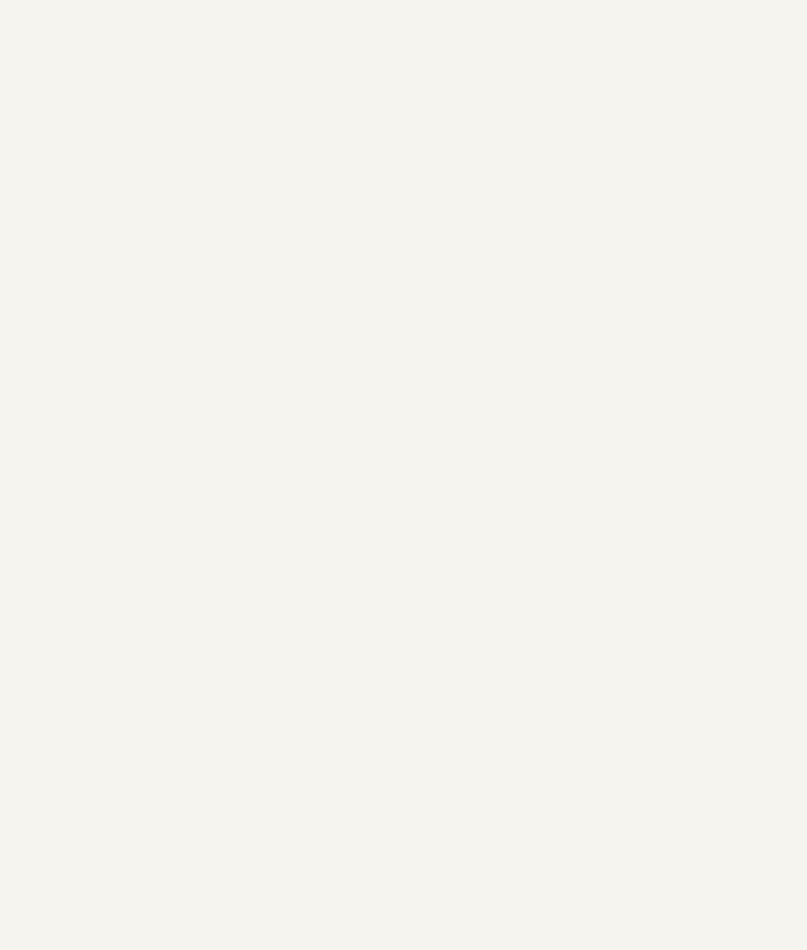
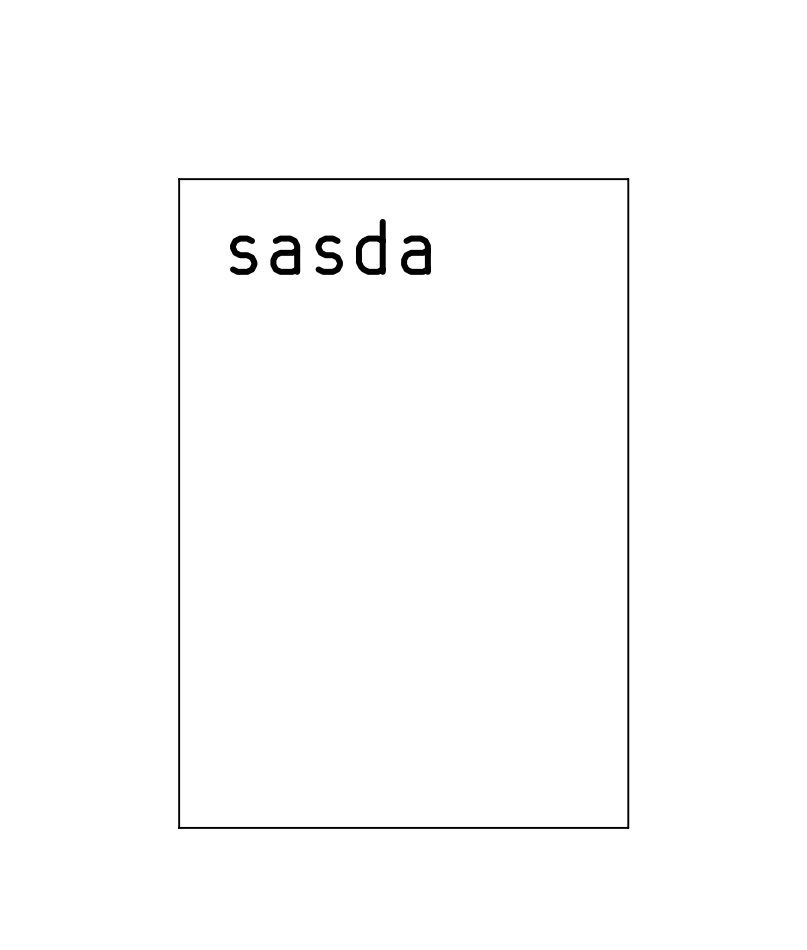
line: none -> (179, 179) (628, 179) (628, 827) (179, 827) (179, 179)
text: none -> sasda (330, 246)

